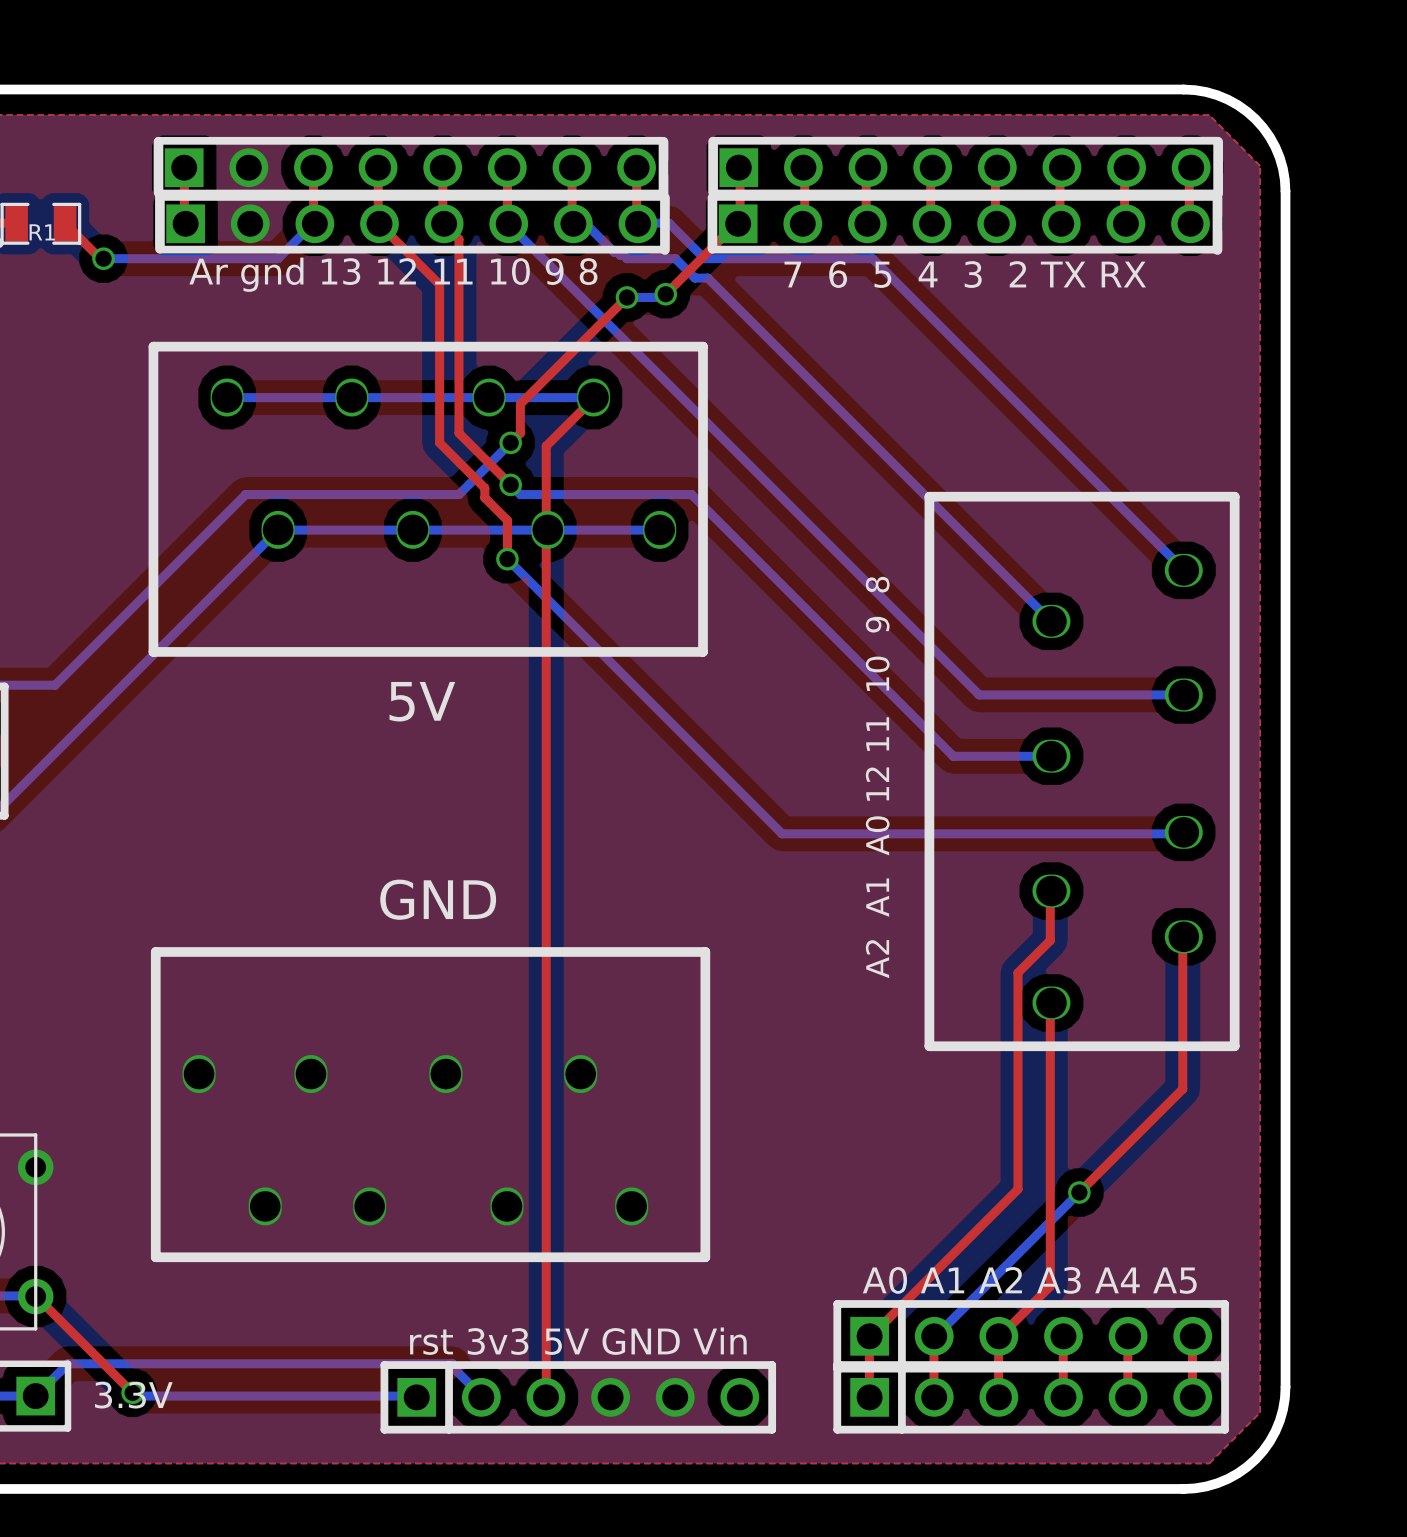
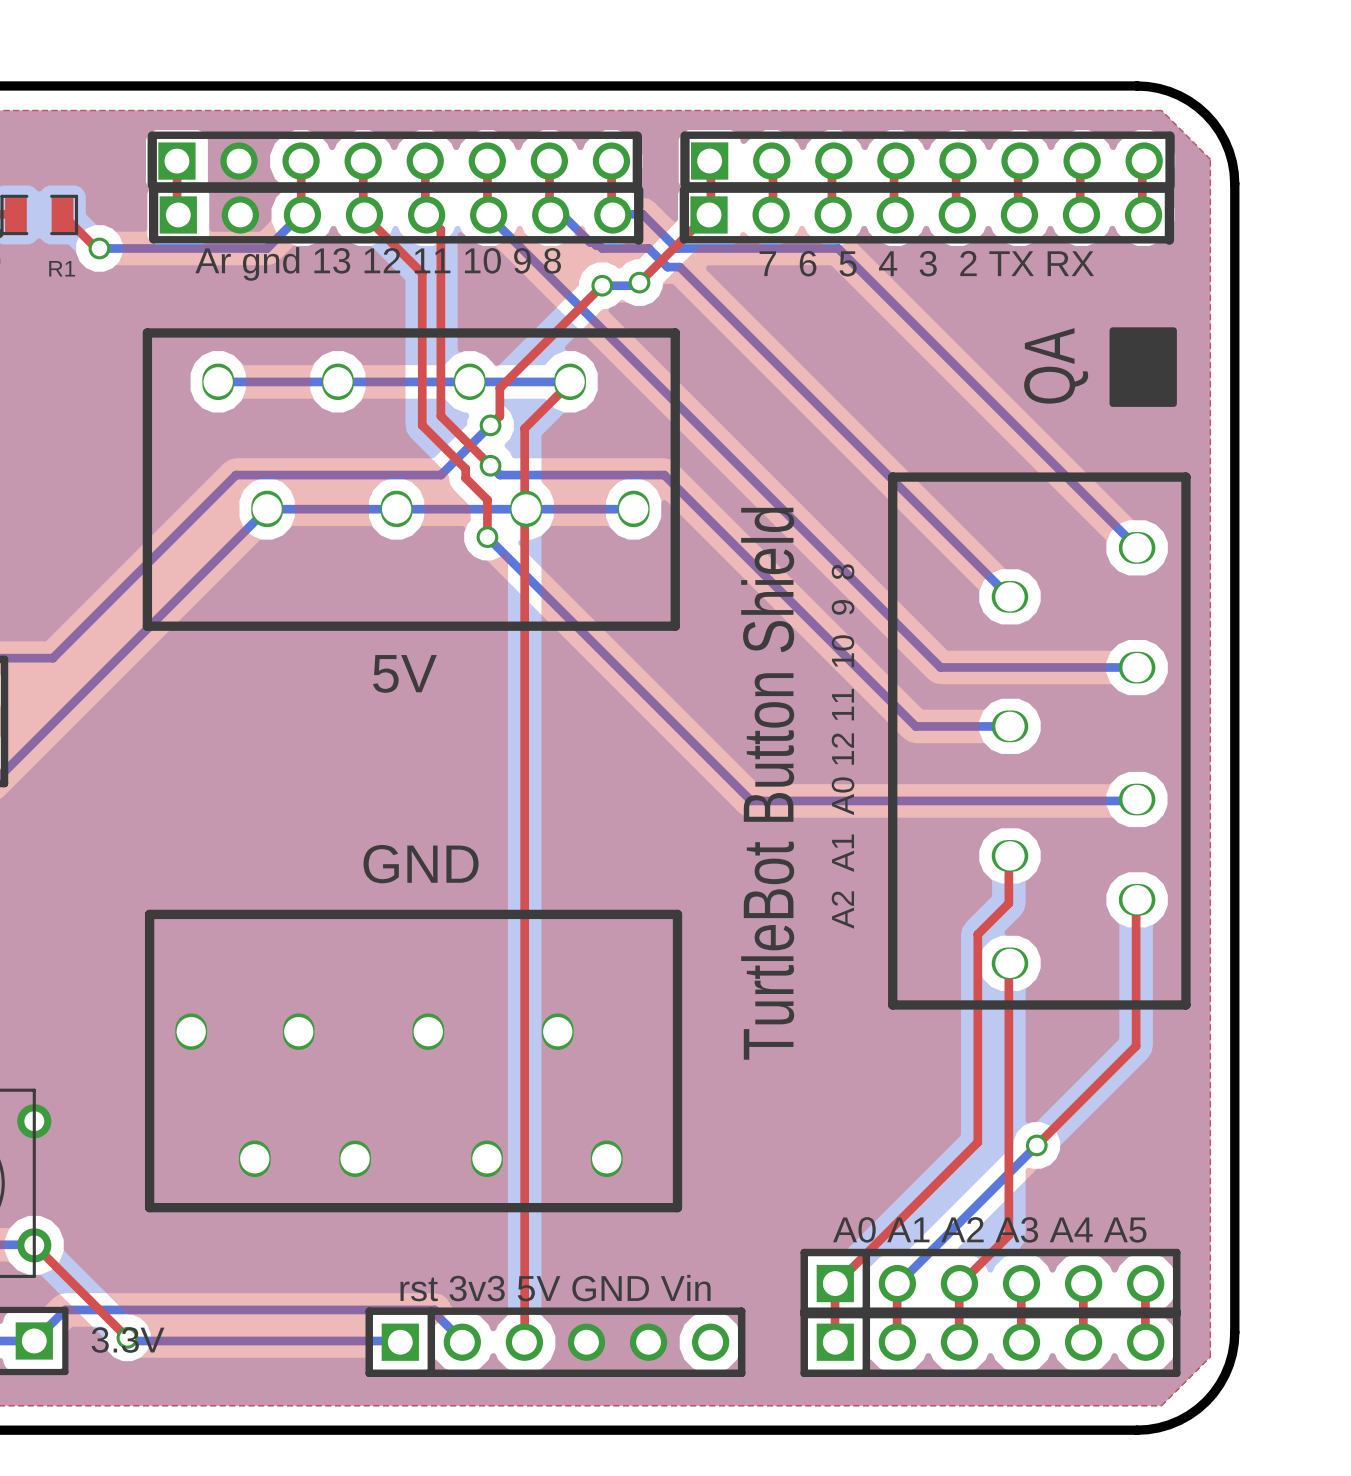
R1 name position: R1 (42, 232) -> R1 (62, 268)
drawing: none -> [1109, 327, 1177, 407]
text: none -> QA (1056, 365)
text: none -> TurtleBot Button Shield (767, 783)

